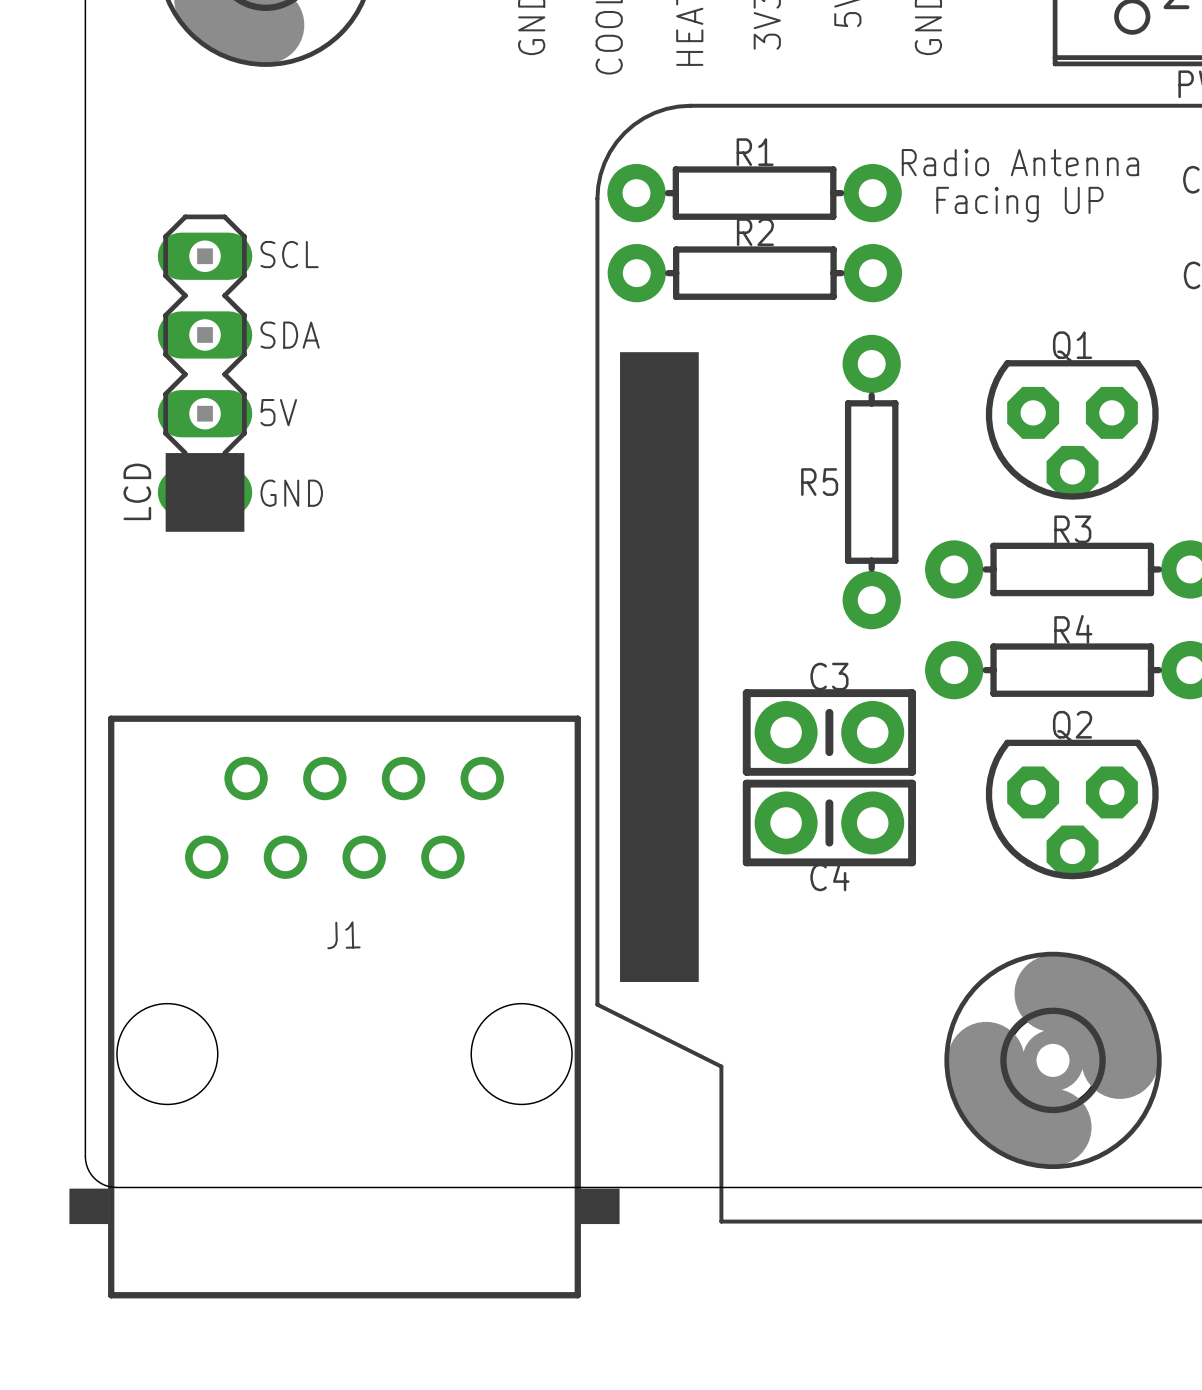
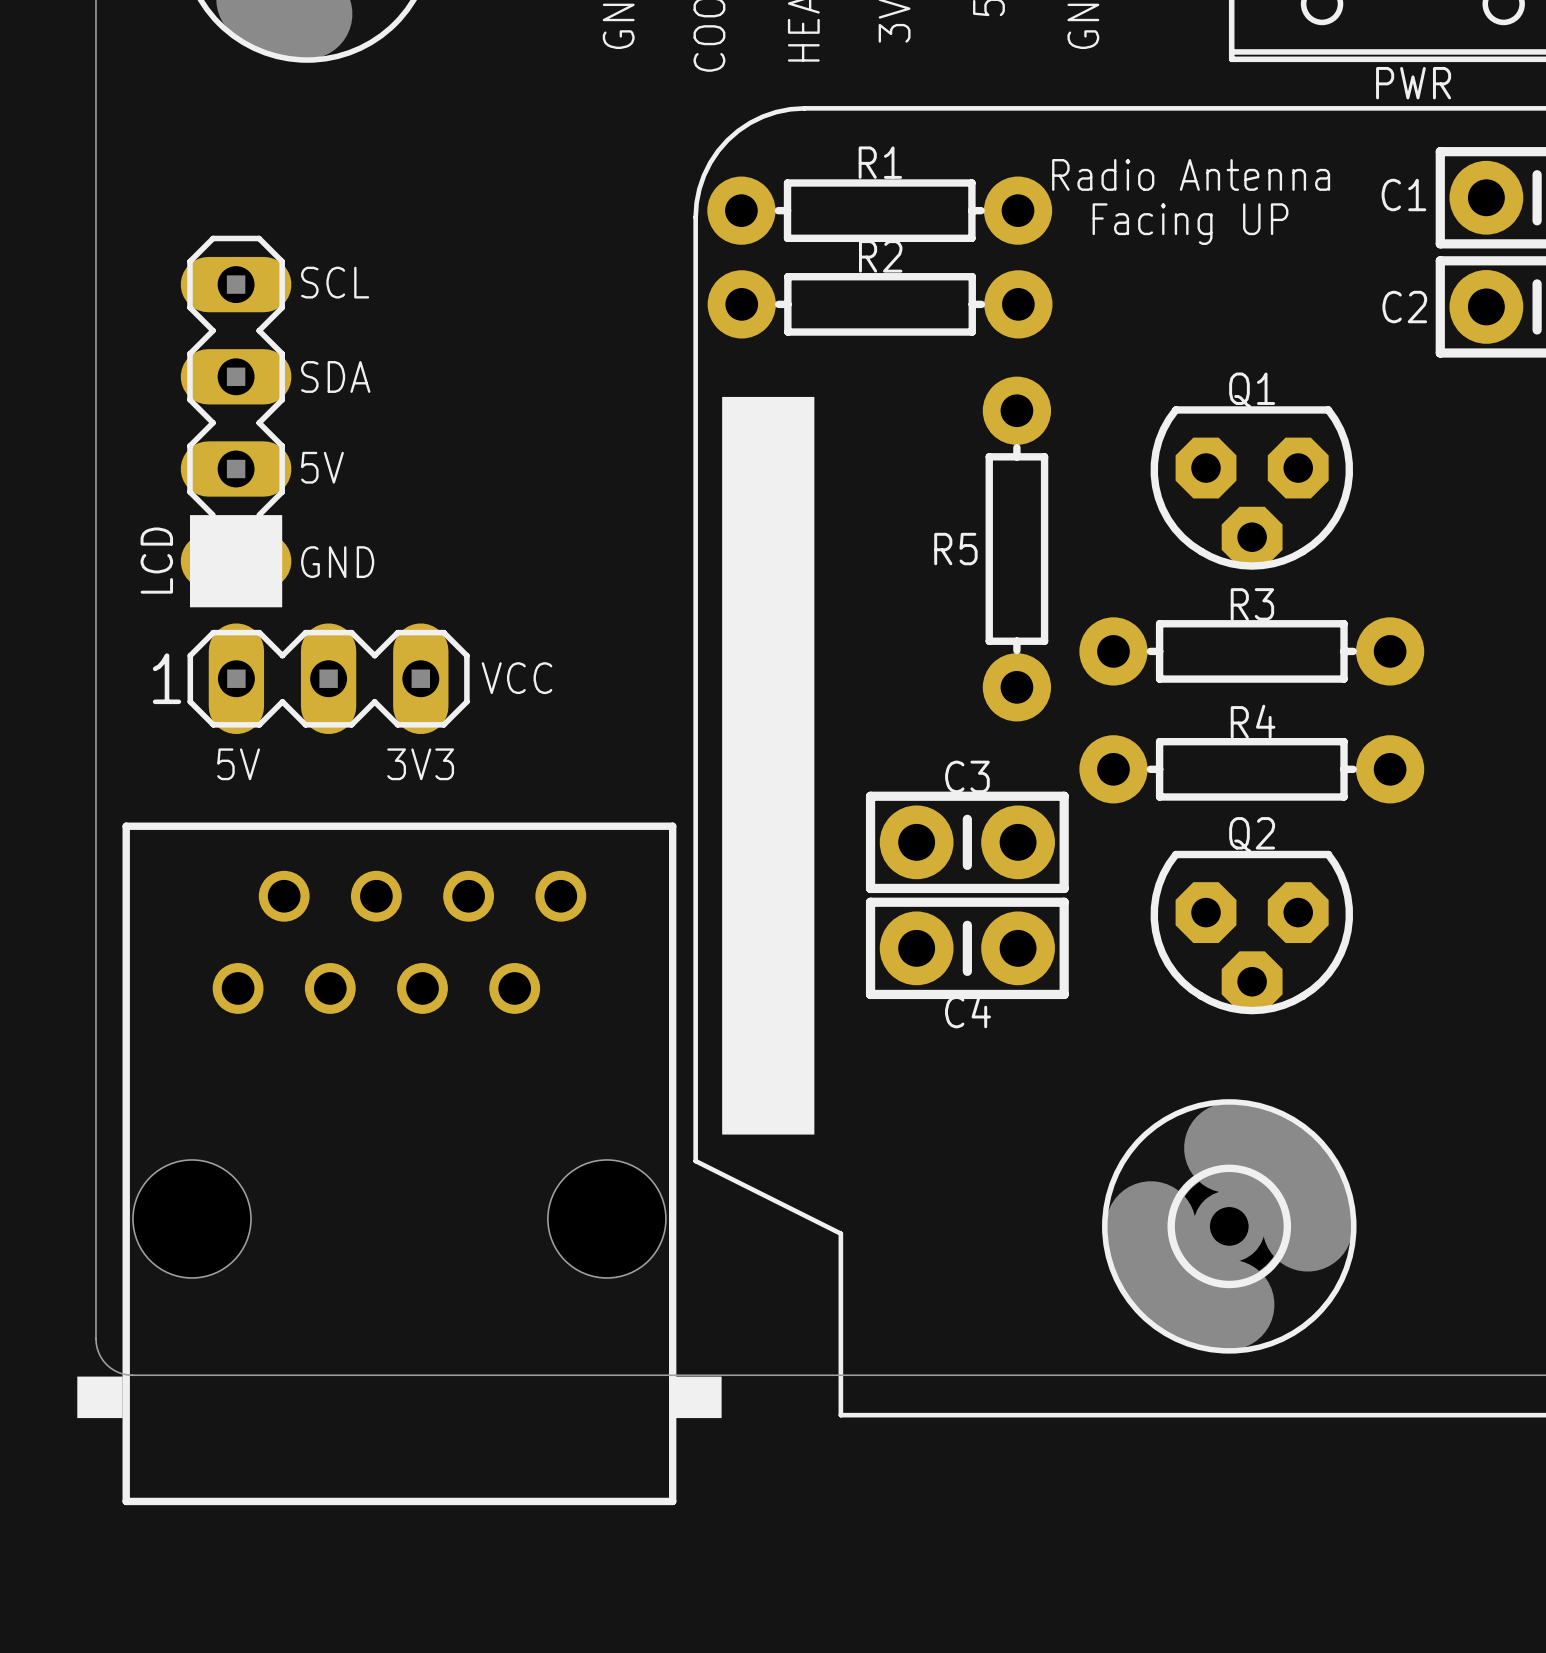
VCC: none -> (328, 678)
text: none -> 5V (238, 764)
text: none -> 3V3 (420, 764)
J1 name: J1 (343, 935) -> none

